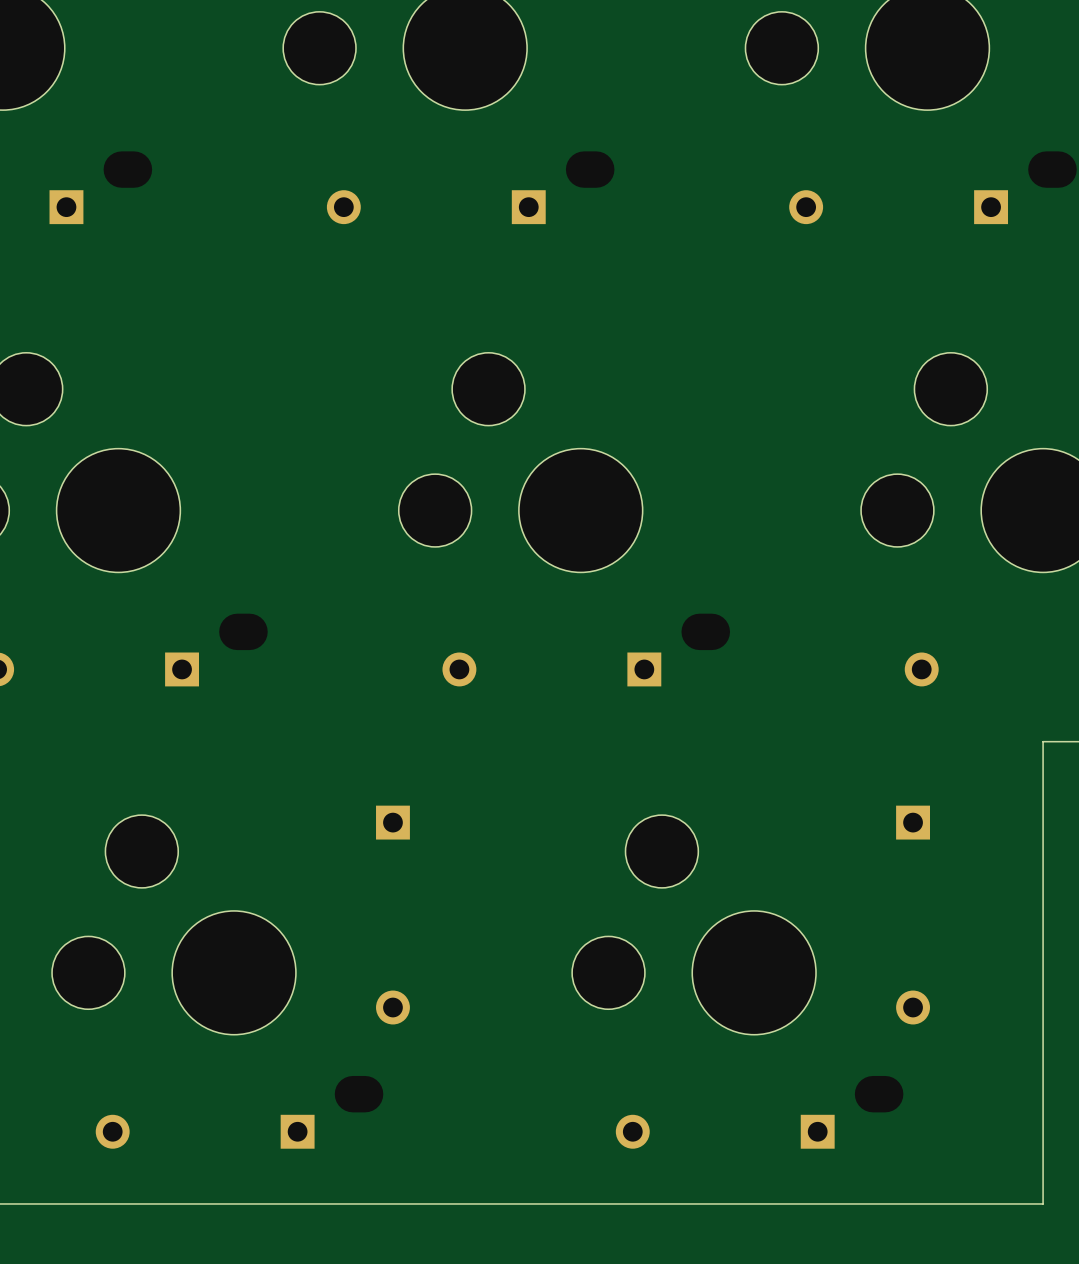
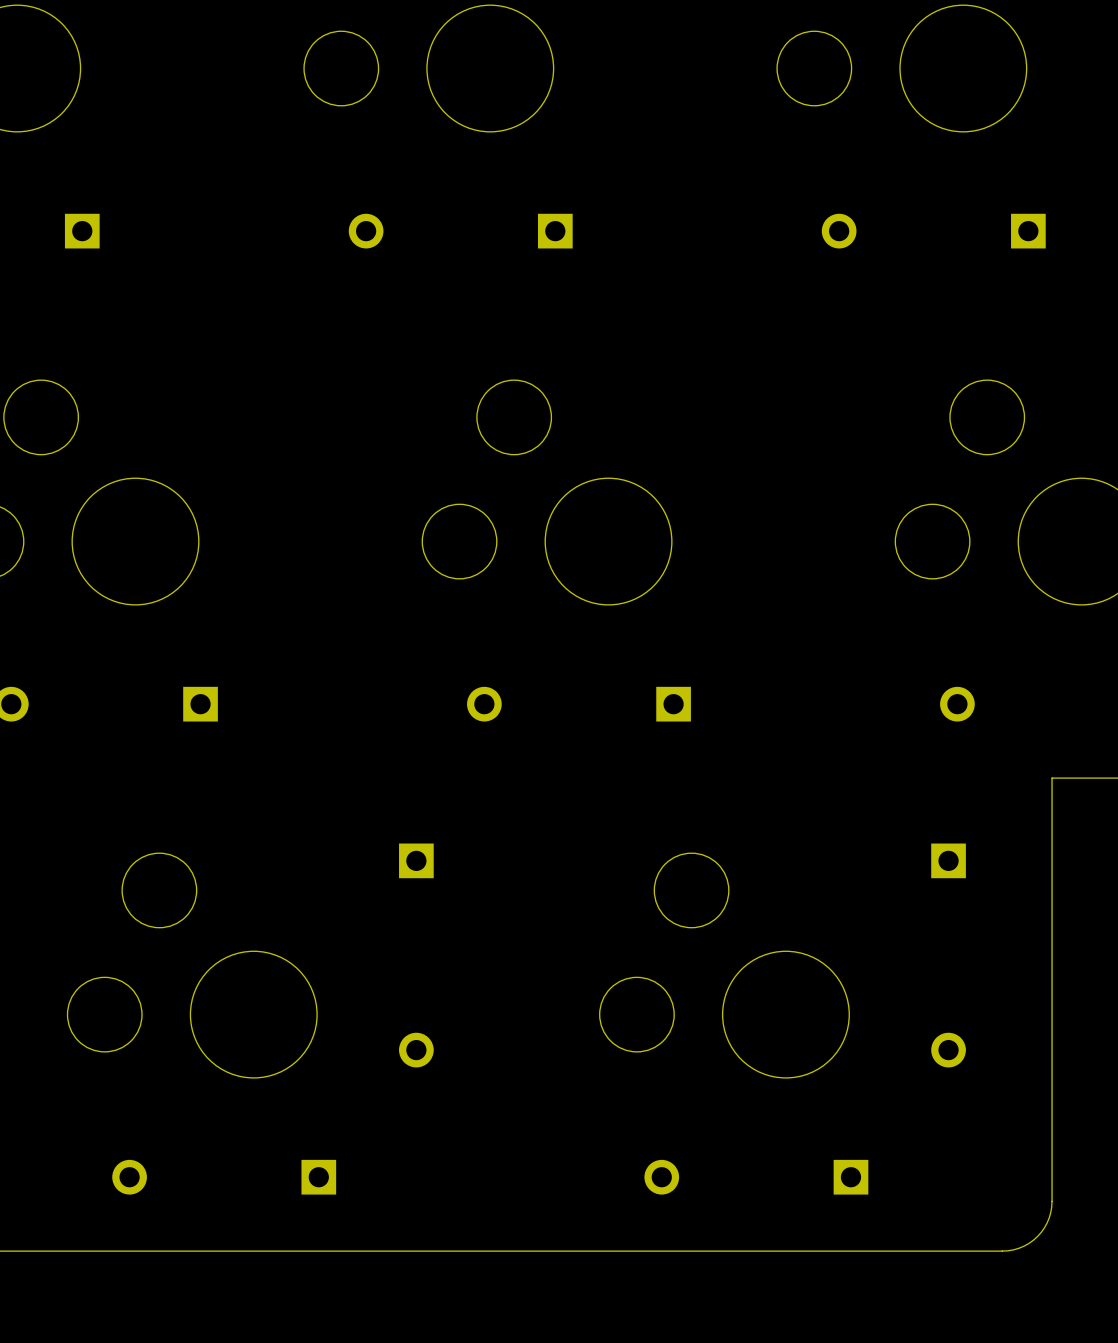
board edge: (1043, 741) (1043, 1203) (965, 1203) -> (1081, 778) (1052, 778) (1051, 1207) (1047, 1223) (1037, 1236) (1023, 1246) (1002, 1251)

